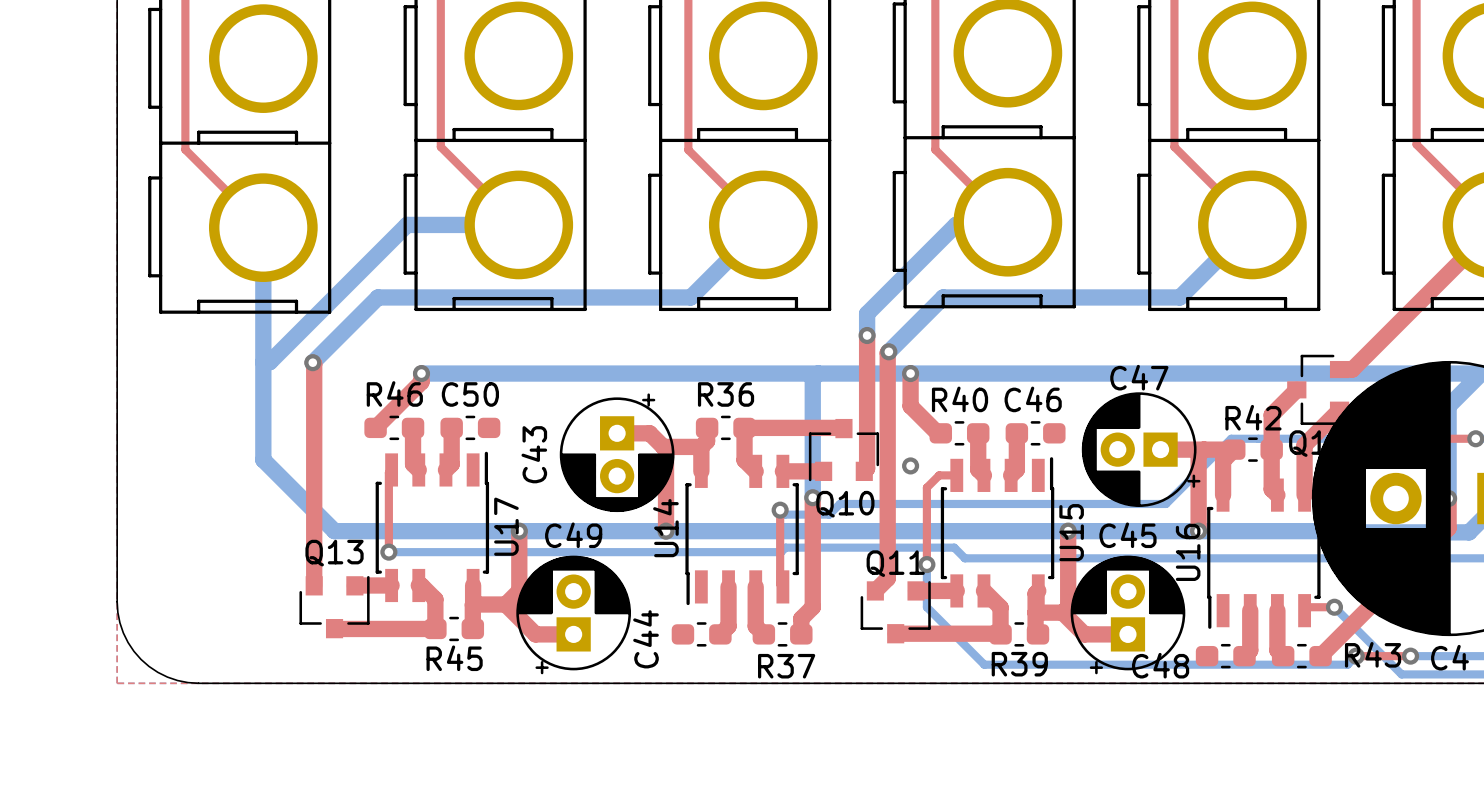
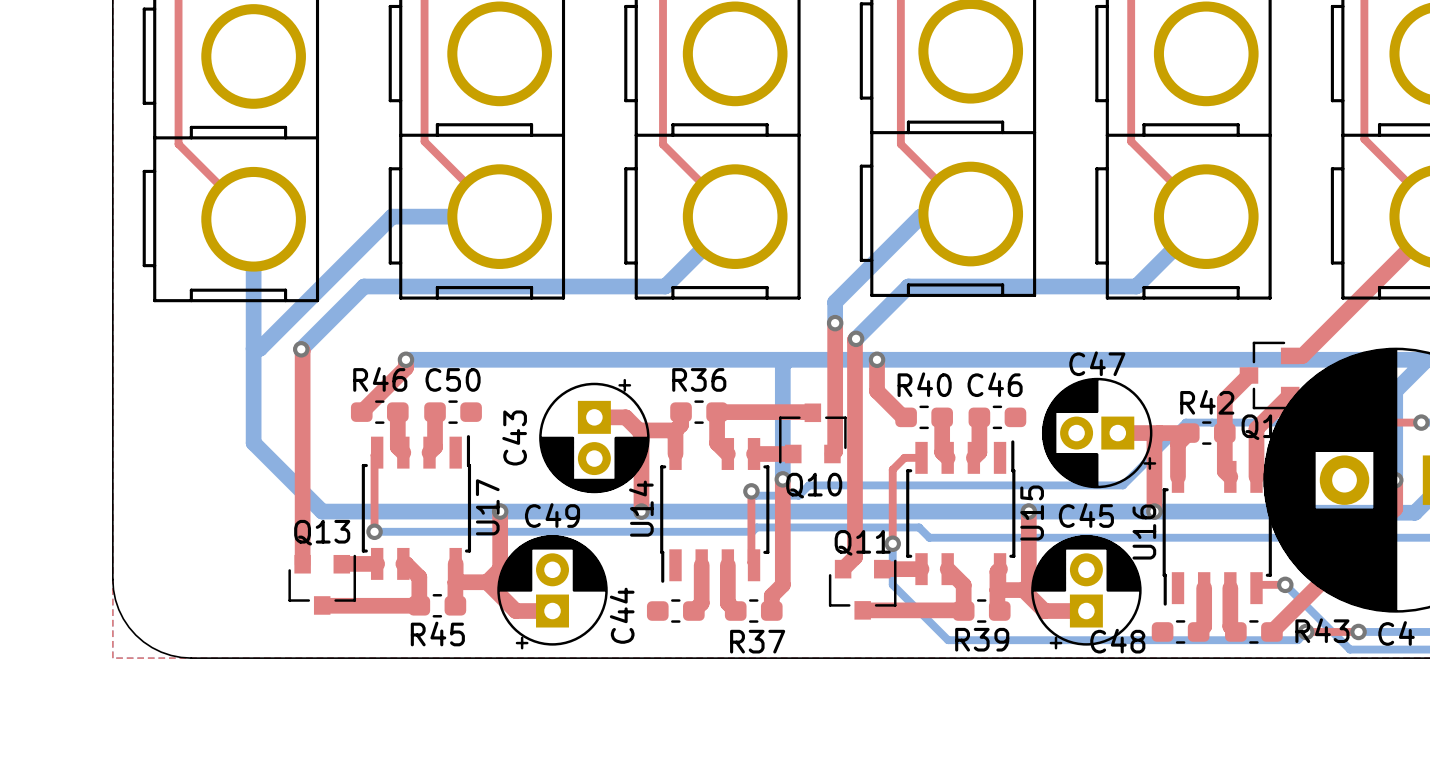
via: (910, 465) -> none

